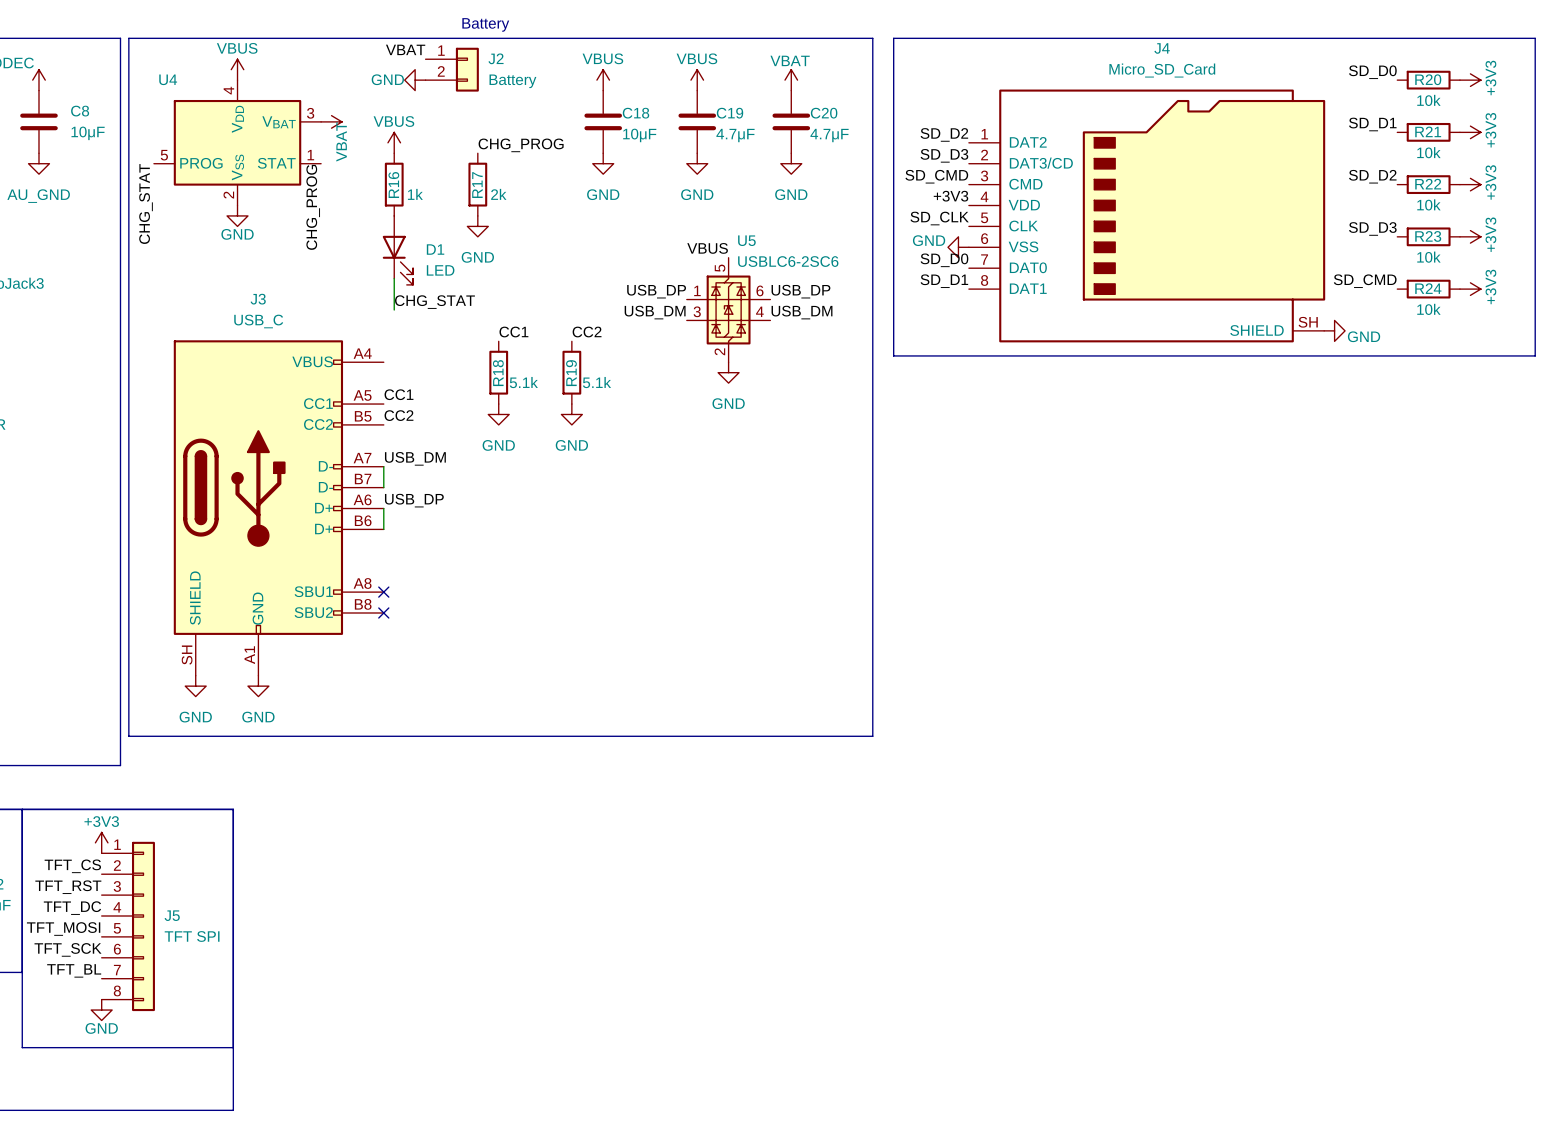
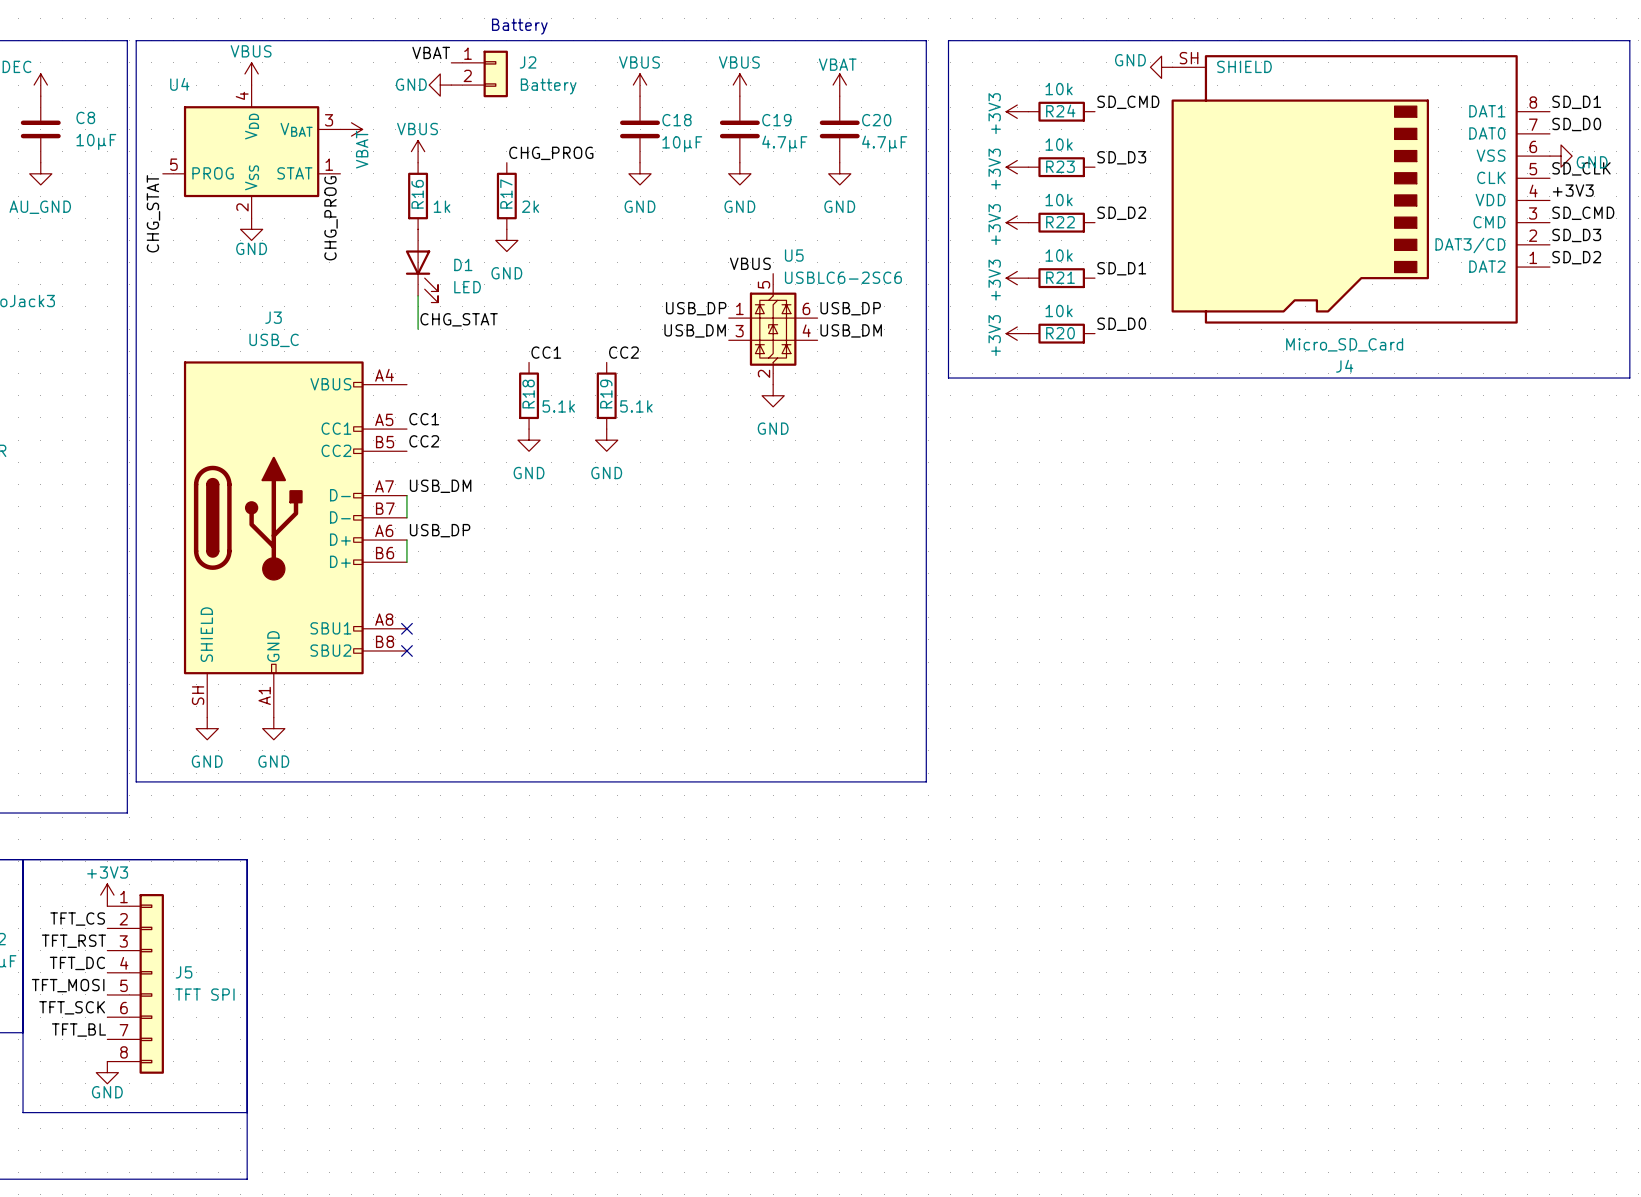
power symbol: none -> GND (1161, 67)
label position: SD_D0 (1372, 72) -> SD_D0 (1576, 124)
R20 name position: R20 (1428, 79) -> R20 (1060, 333)
R20 position: (1428, 80) -> (1061, 333)
power symbol: +3V3 (1470, 80) -> none
R20 value position: 10k (1428, 100) -> 10k (1059, 311)
power symbol: none -> +3V3 (1017, 111)
label position: SD_D1 (1372, 124) -> SD_D1 (1576, 102)
R21 name position: R21 (1428, 131) -> R21 (1060, 277)
R21 position: (1428, 132) -> (1061, 278)
power symbol: +3V3 (1470, 132) -> none
label position: SD_D2 (944, 134) -> SD_D2 (1121, 213)
power symbol: none -> GND (1561, 156)
R21 value position: 10k (1428, 152) -> 10k (1059, 255)
label position: SD_D3 (944, 155) -> SD_D3 (1121, 157)
power symbol: none -> +3V3 (1017, 167)
label: none -> SD_CLK (1581, 168)
label position: SD_CMD (936, 176) -> SD_CMD (1128, 102)
label position: SD_D2 (1372, 176) -> SD_D2 (1576, 257)
label: none -> +3V3 (1573, 190)
R22 position: (1428, 184) -> (1061, 222)
R22 name position: R22 (1428, 184) -> R22 (1060, 222)
power symbol: +3V3 (1470, 184) -> none
label: +3V3 (950, 196) -> none
R22 value position: 10k (1428, 204) -> 10k (1059, 200)
power symbol: none -> +3V3 (1017, 222)
J4 rotation: 0° (1162, 215) -> 180° (1344, 189)
label: SD_CLK (939, 218) -> none
label position: SD_D3 (1372, 228) -> SD_D3 (1576, 235)
R23 position: (1428, 236) -> (1061, 167)
R23 name position: R23 (1428, 236) -> R23 (1060, 166)
power symbol: +3V3 (1470, 236) -> none
power symbol: GND (958, 247) -> none
R23 value position: 10k (1428, 257) -> 10k (1059, 144)
label position: SD_D0 (944, 260) -> SD_D0 (1121, 324)
power symbol: none -> +3V3 (1017, 278)
label position: SD_D1 (944, 281) -> SD_D1 (1121, 268)
label position: SD_CMD (1365, 281) -> SD_CMD (1583, 213)
R24 name position: R24 (1428, 288) -> R24 (1060, 111)
R24 position: (1428, 289) -> (1061, 111)
power symbol: +3V3 (1470, 289) -> none
R24 value position: 10k (1428, 309) -> 10k (1059, 89)
power symbol: none -> +3V3 (1017, 333)
power symbol: GND (1334, 330) -> none

